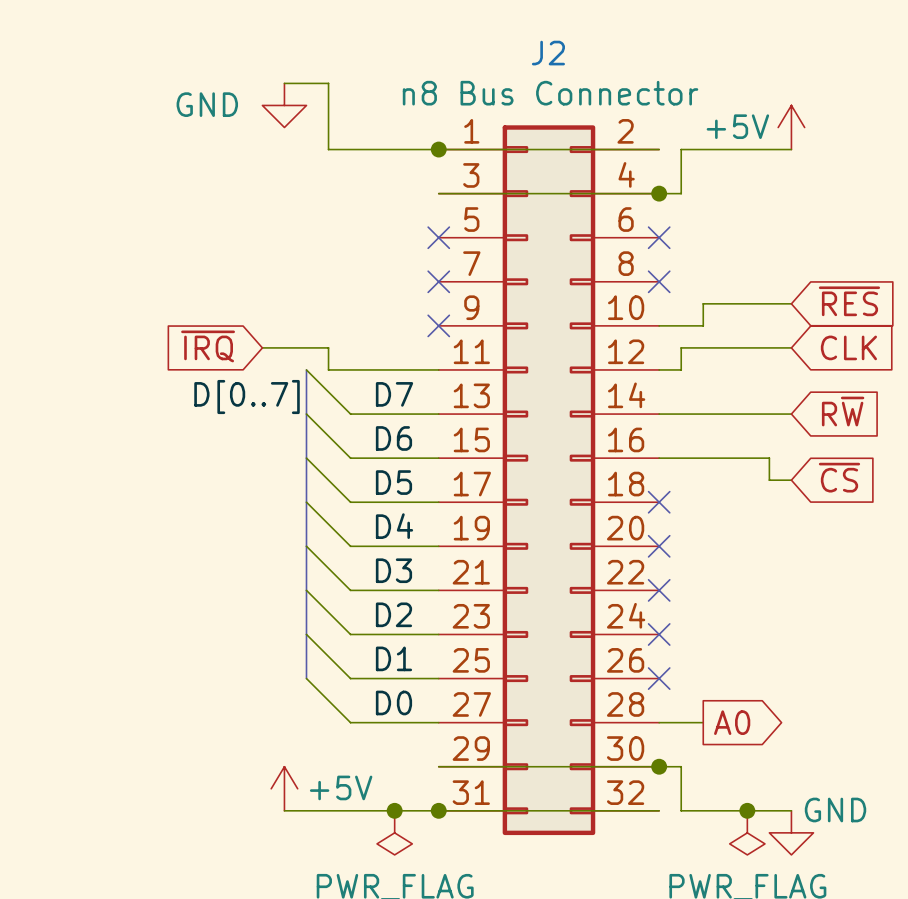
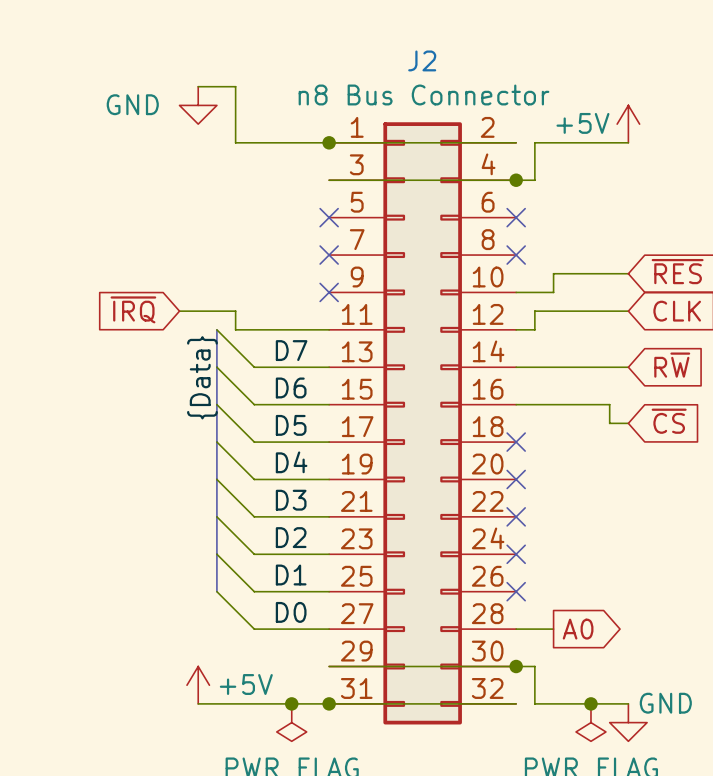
label: D[0..7] (247, 397) -> none
label: none -> {Data} (202, 377)

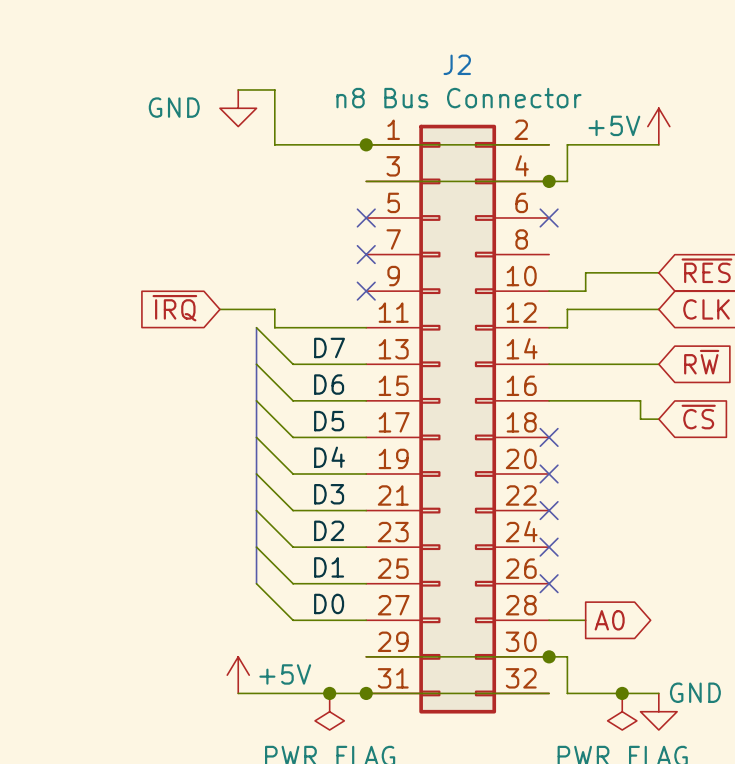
no-connect mark: (516, 255) -> none
label: {Data} (202, 377) -> none

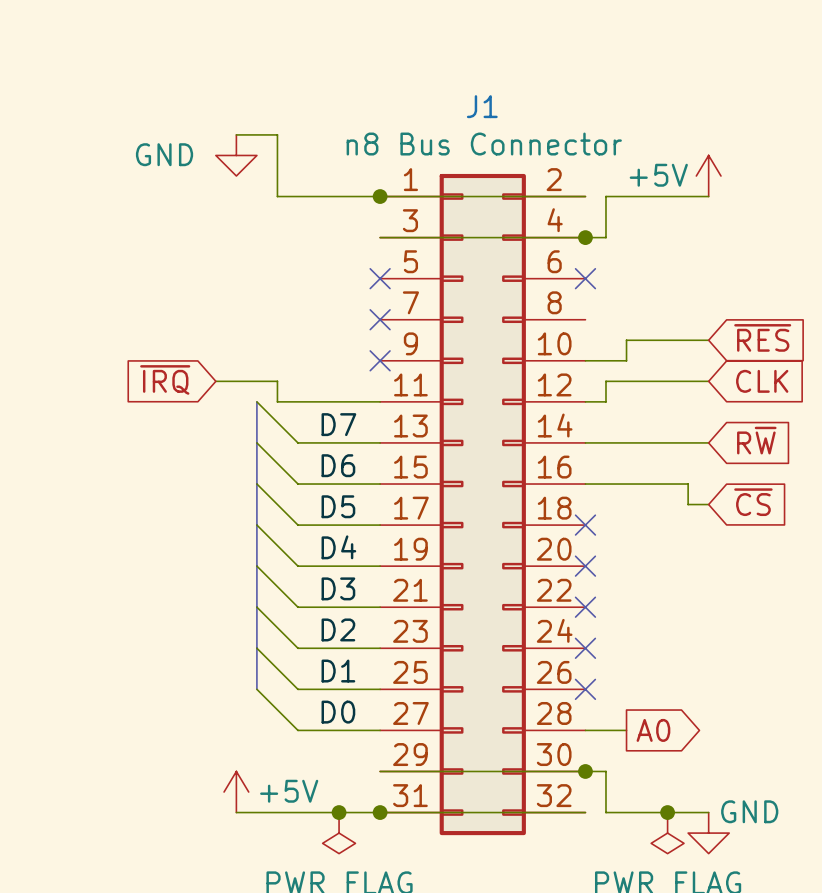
J2 name: J2 (457, 64) -> J1 (482, 106)

